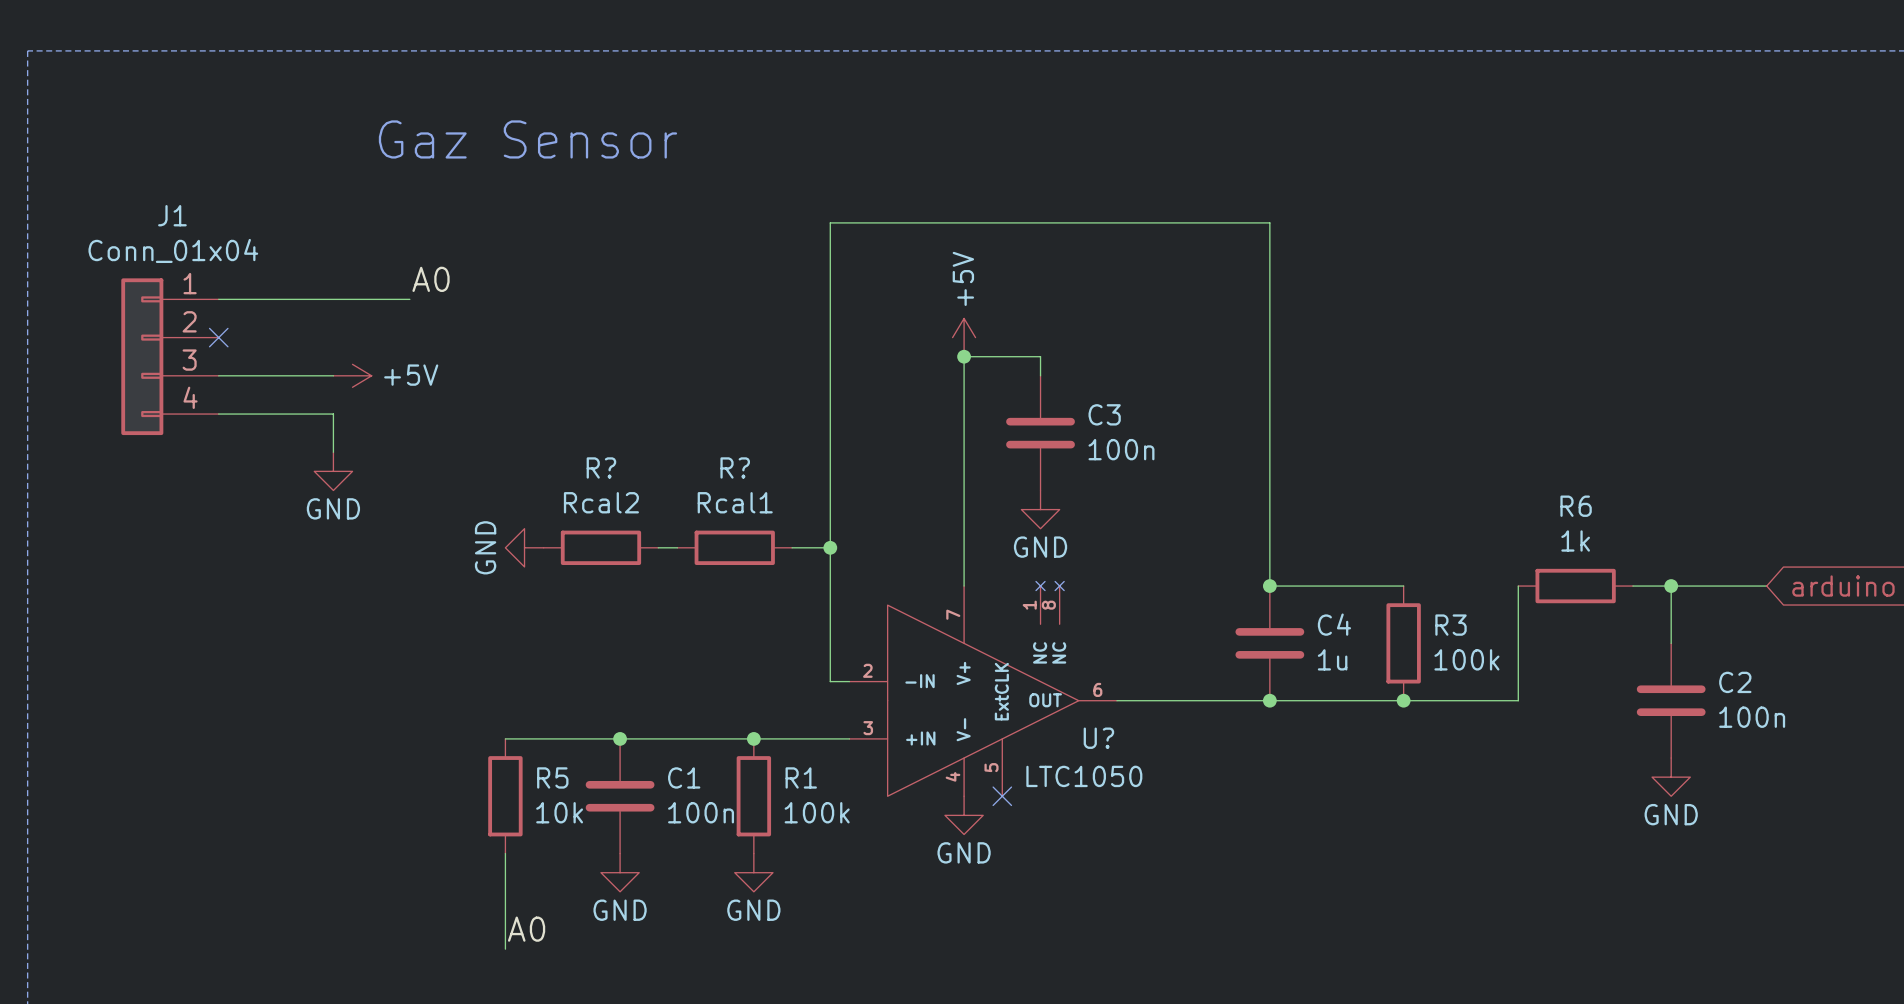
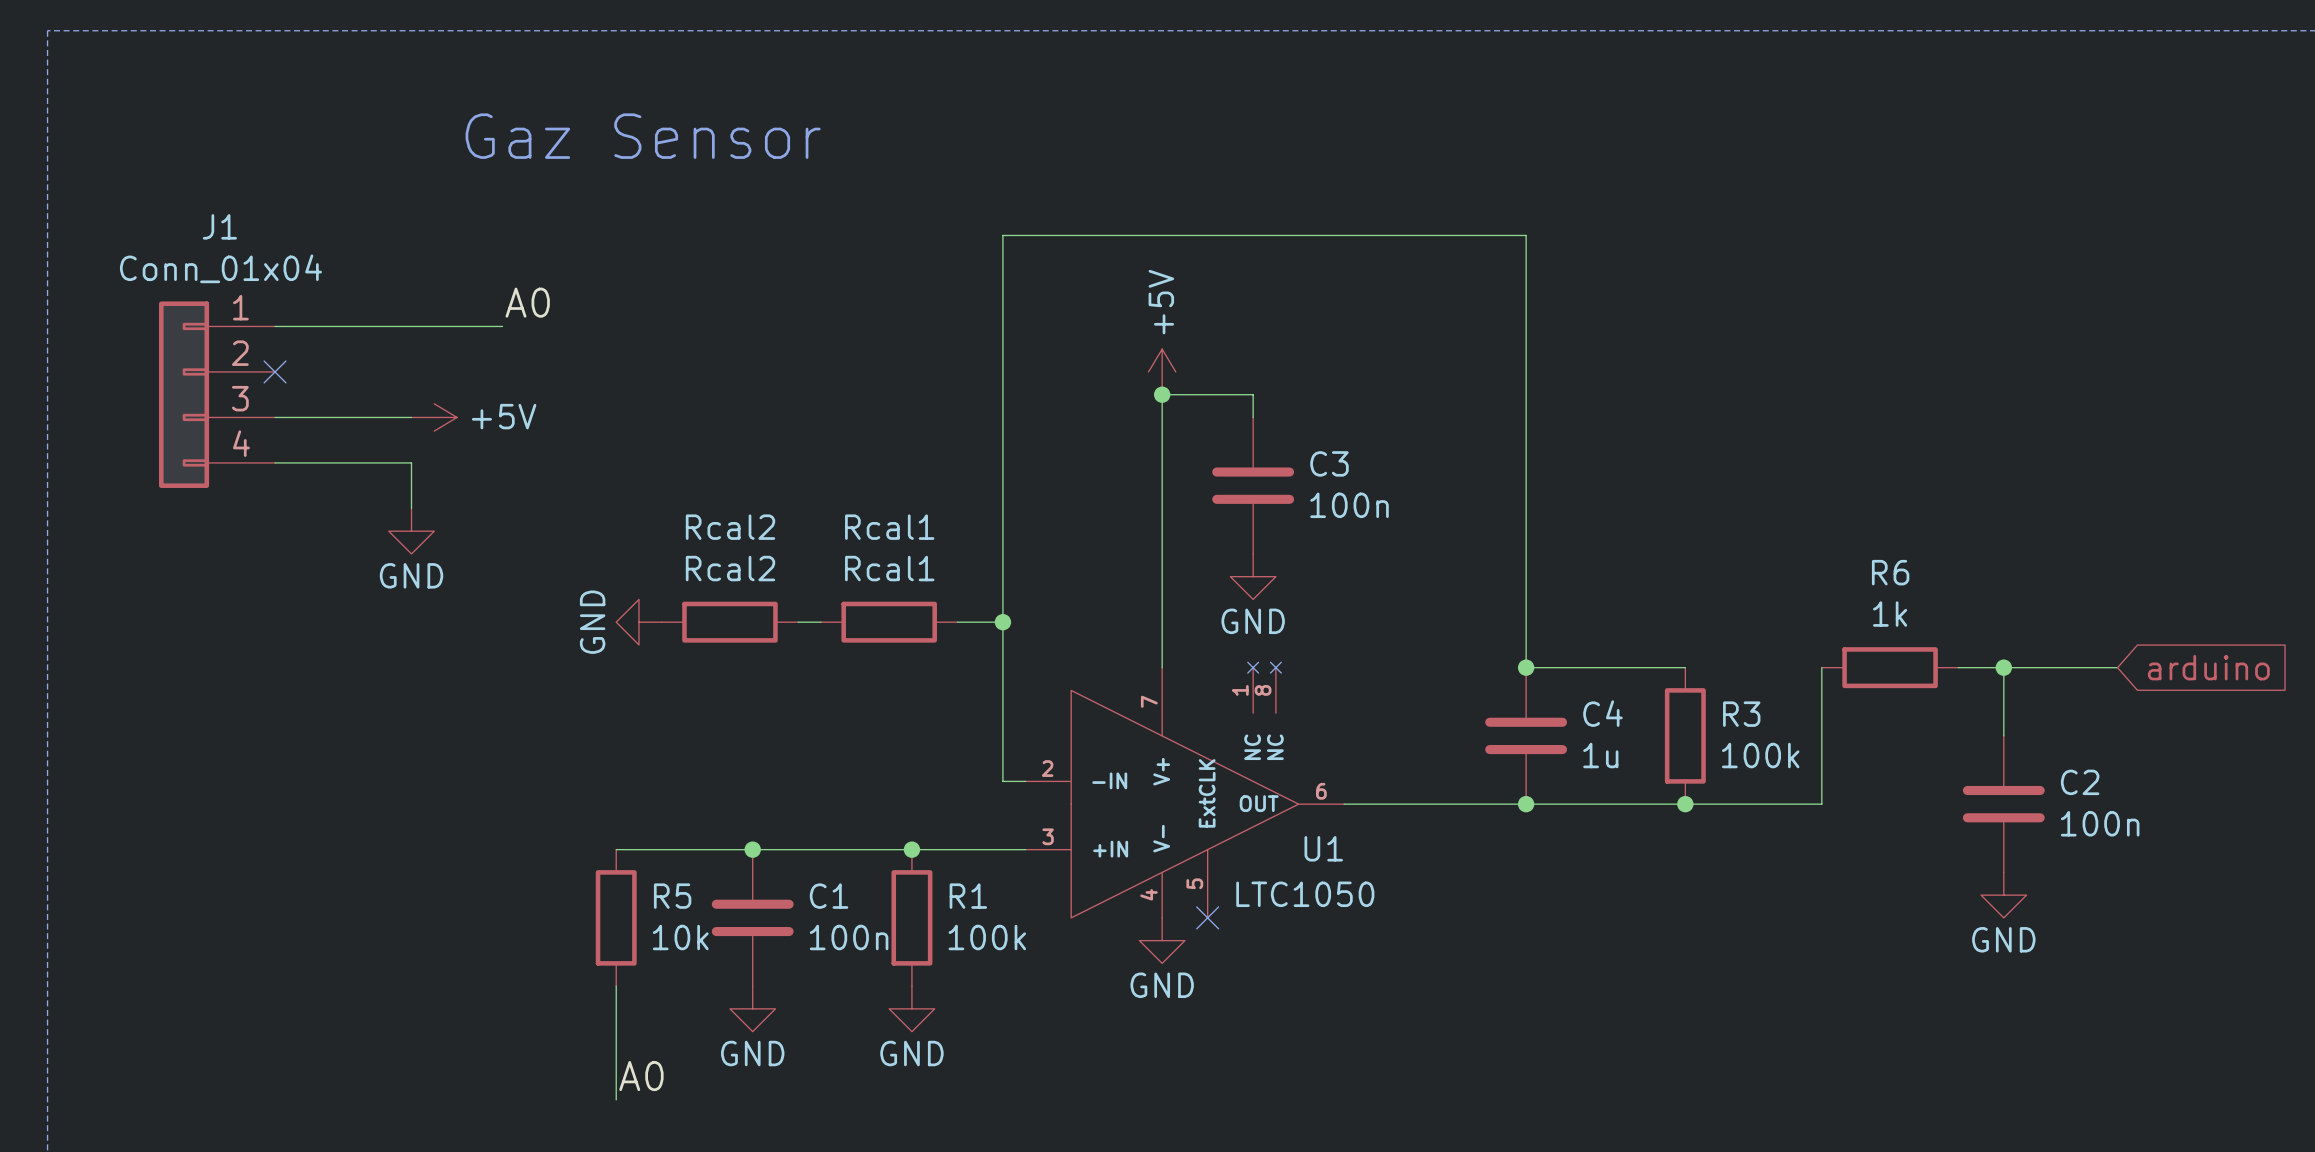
R? name: R? (601, 467) -> Rcal2 (730, 527)
R? name: R? (735, 467) -> Rcal1 (889, 527)
U? name: U? (1098, 738) -> U1 (1323, 848)

